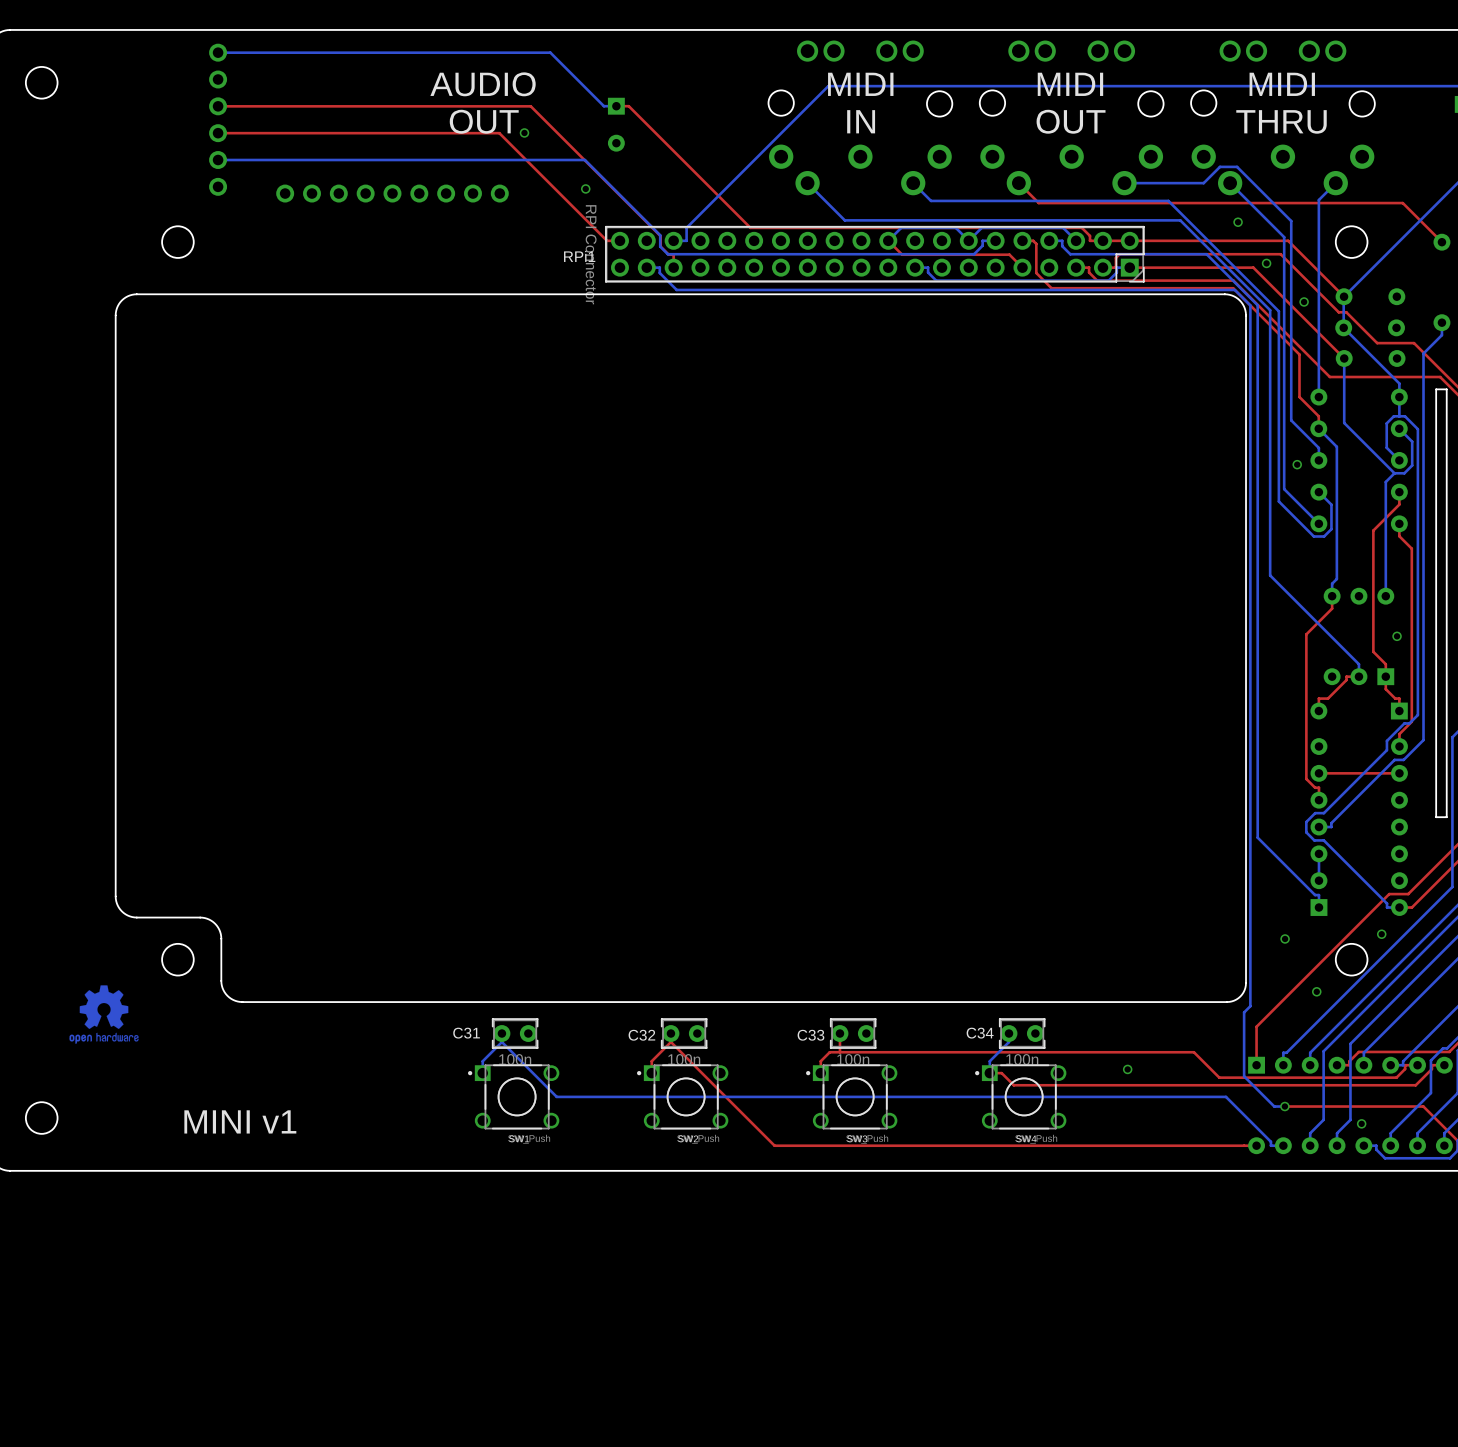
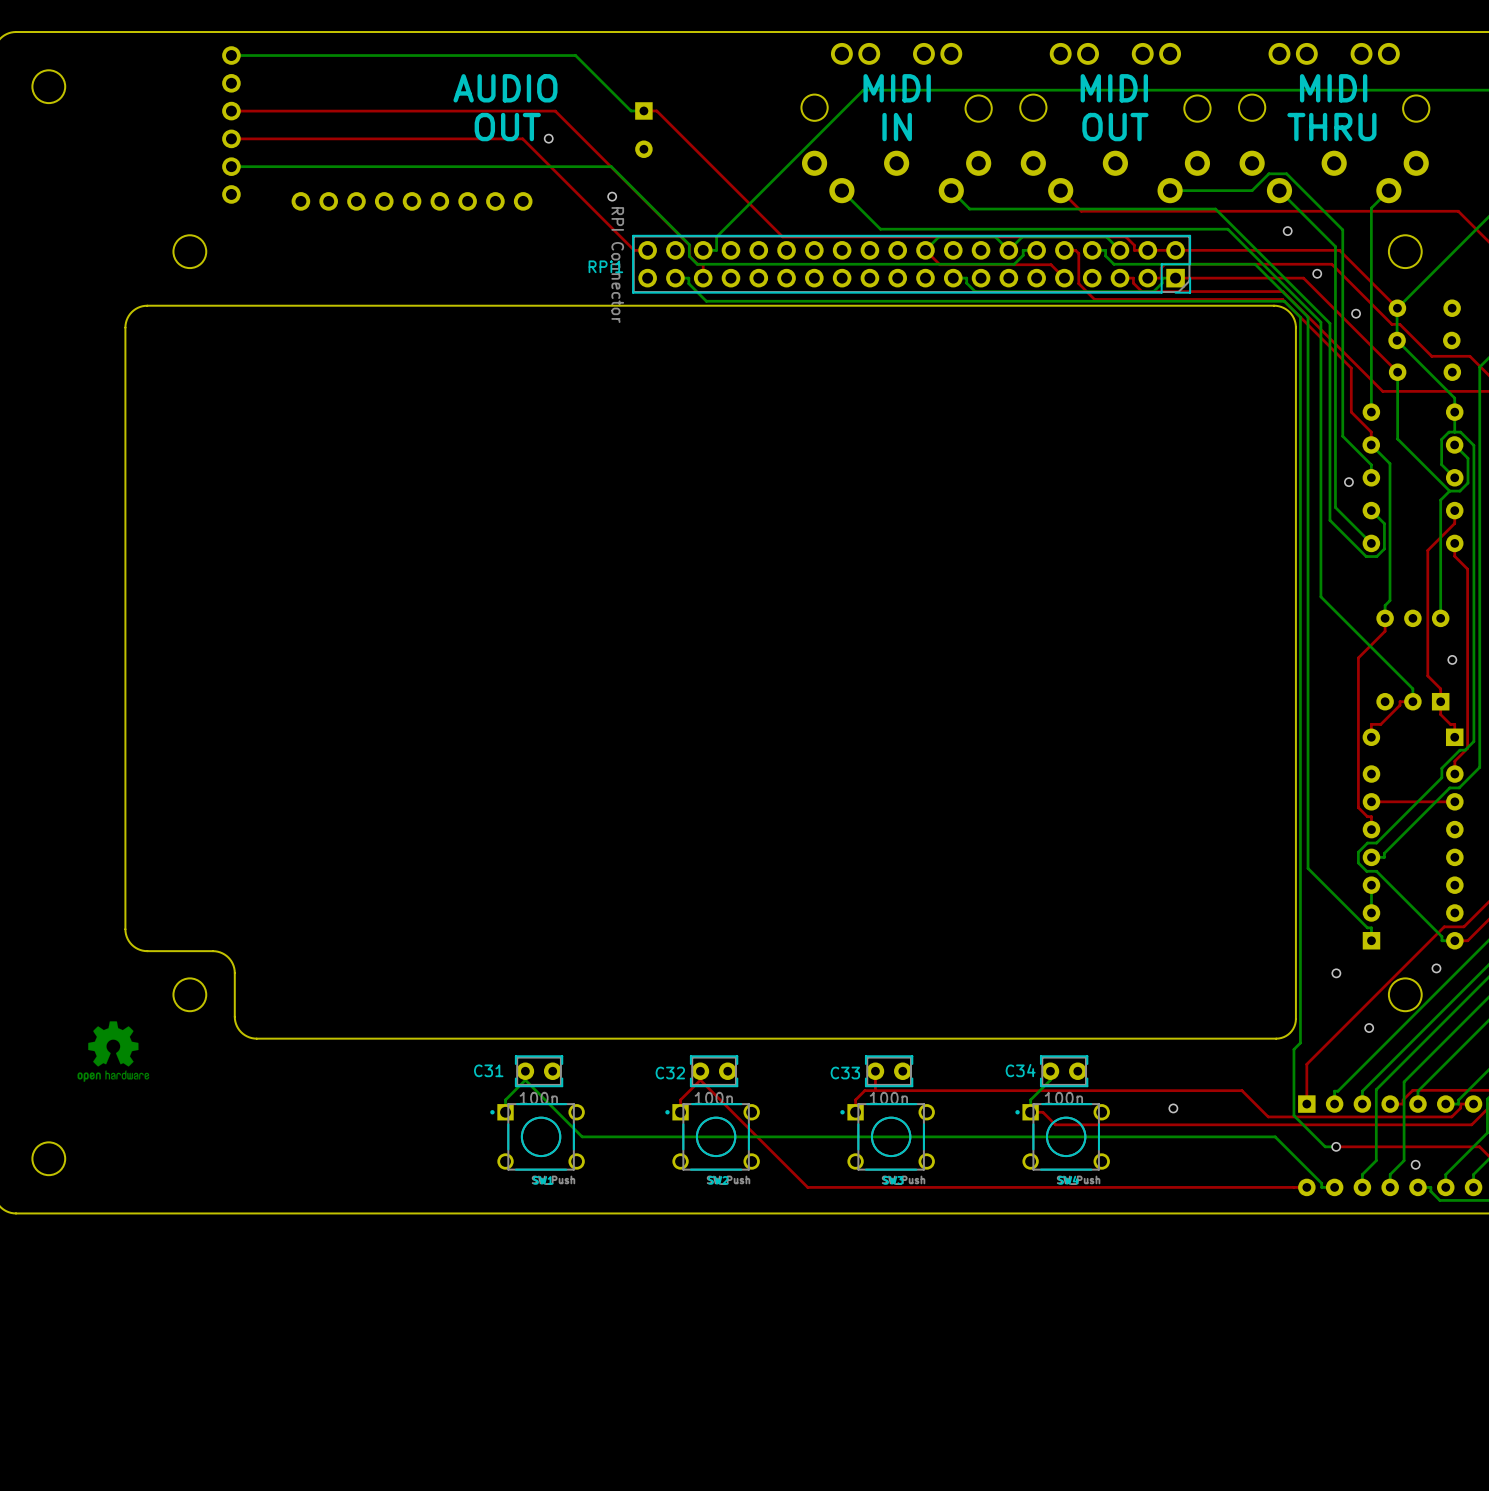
drawing: [184, 1110, 297, 1134] -> none

